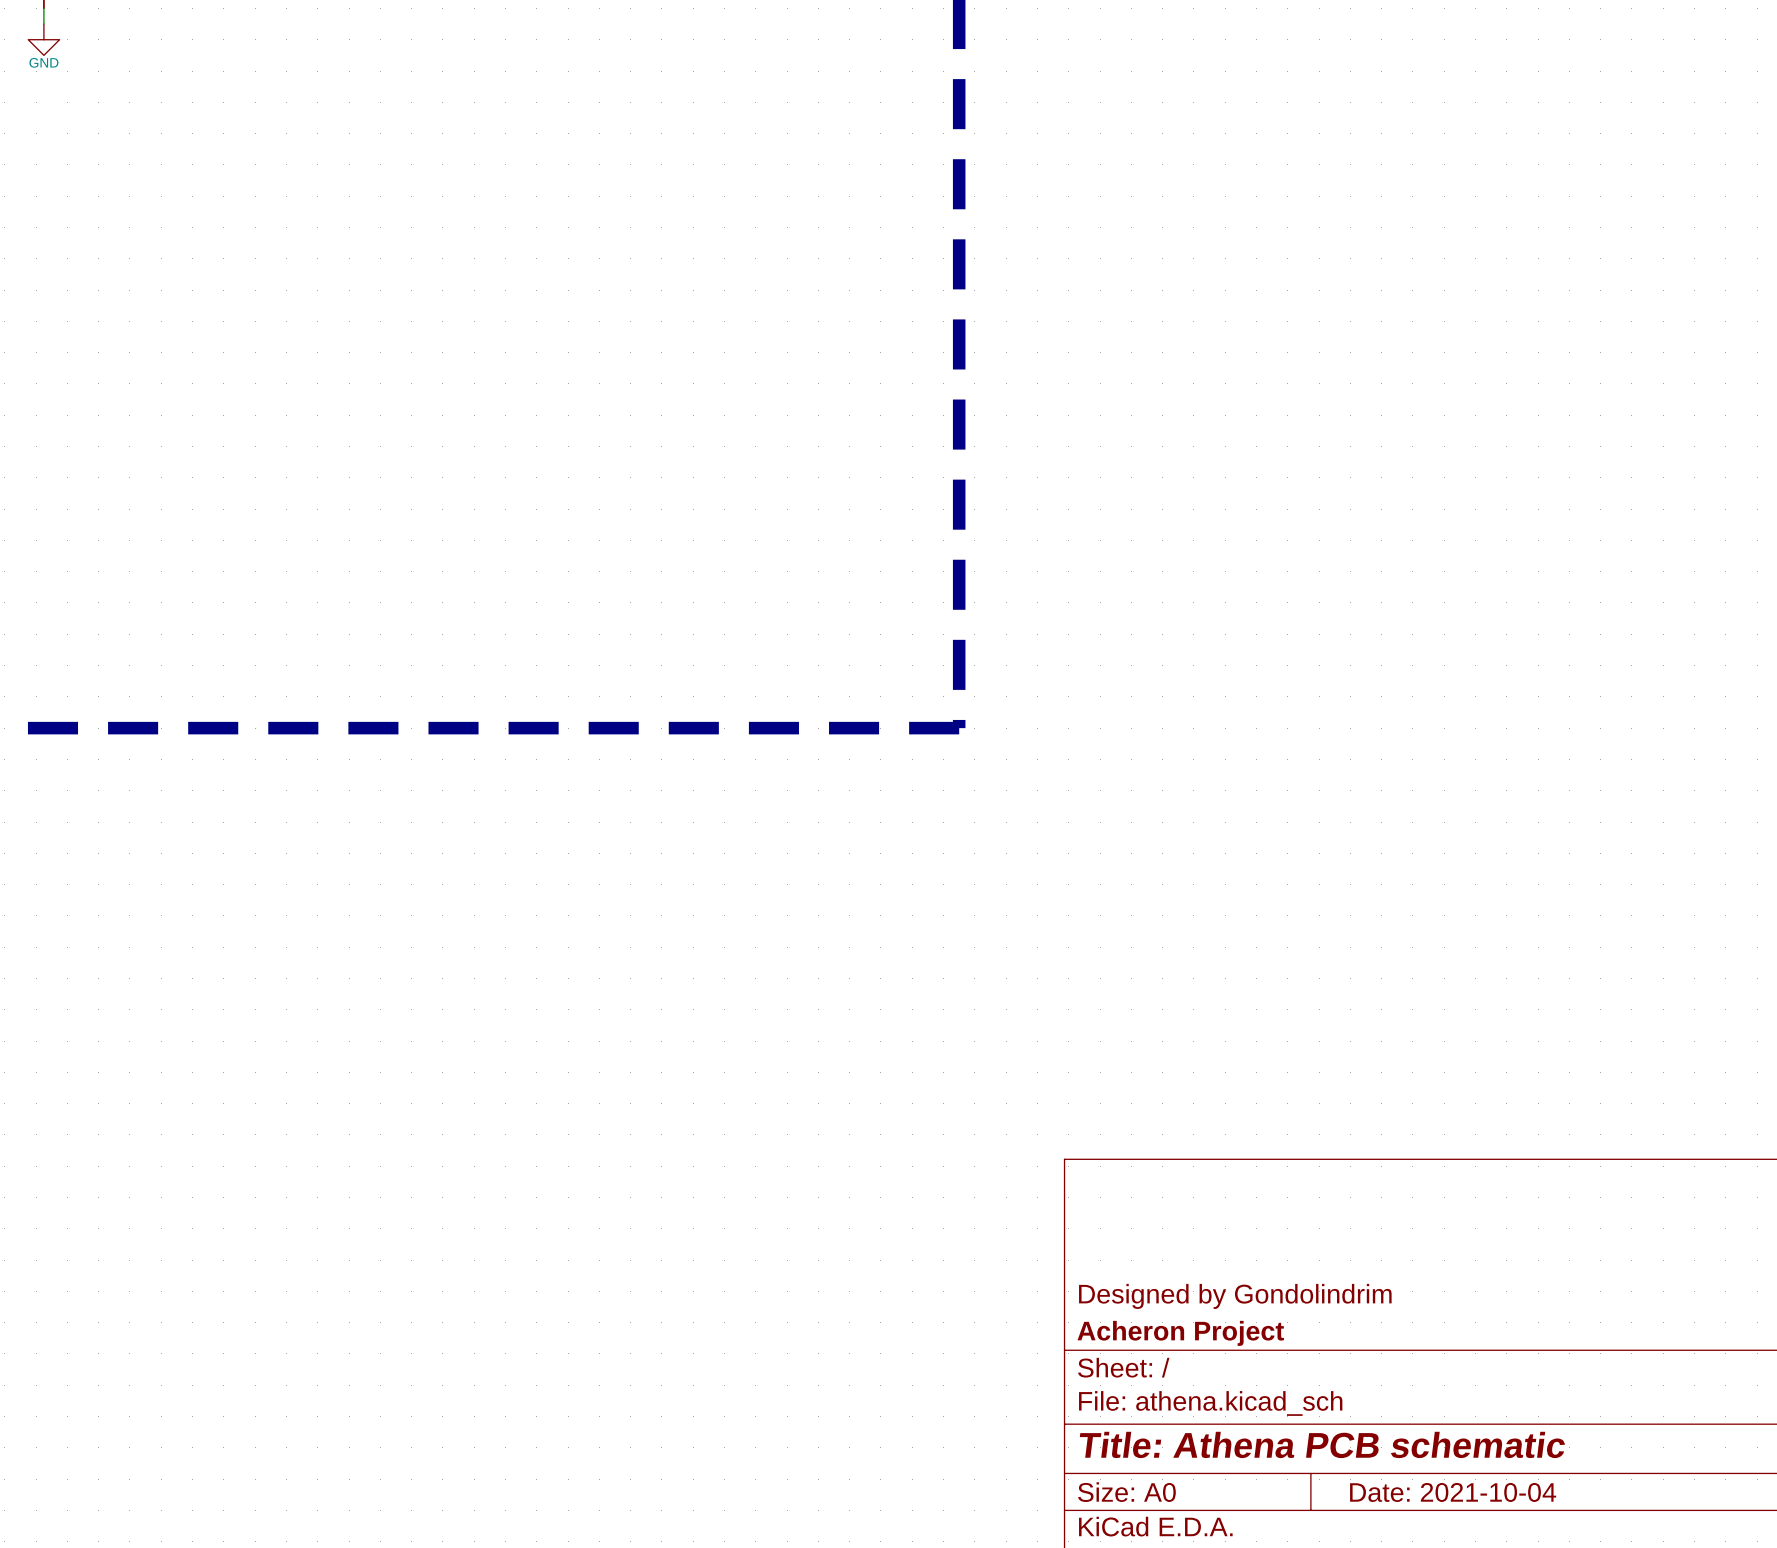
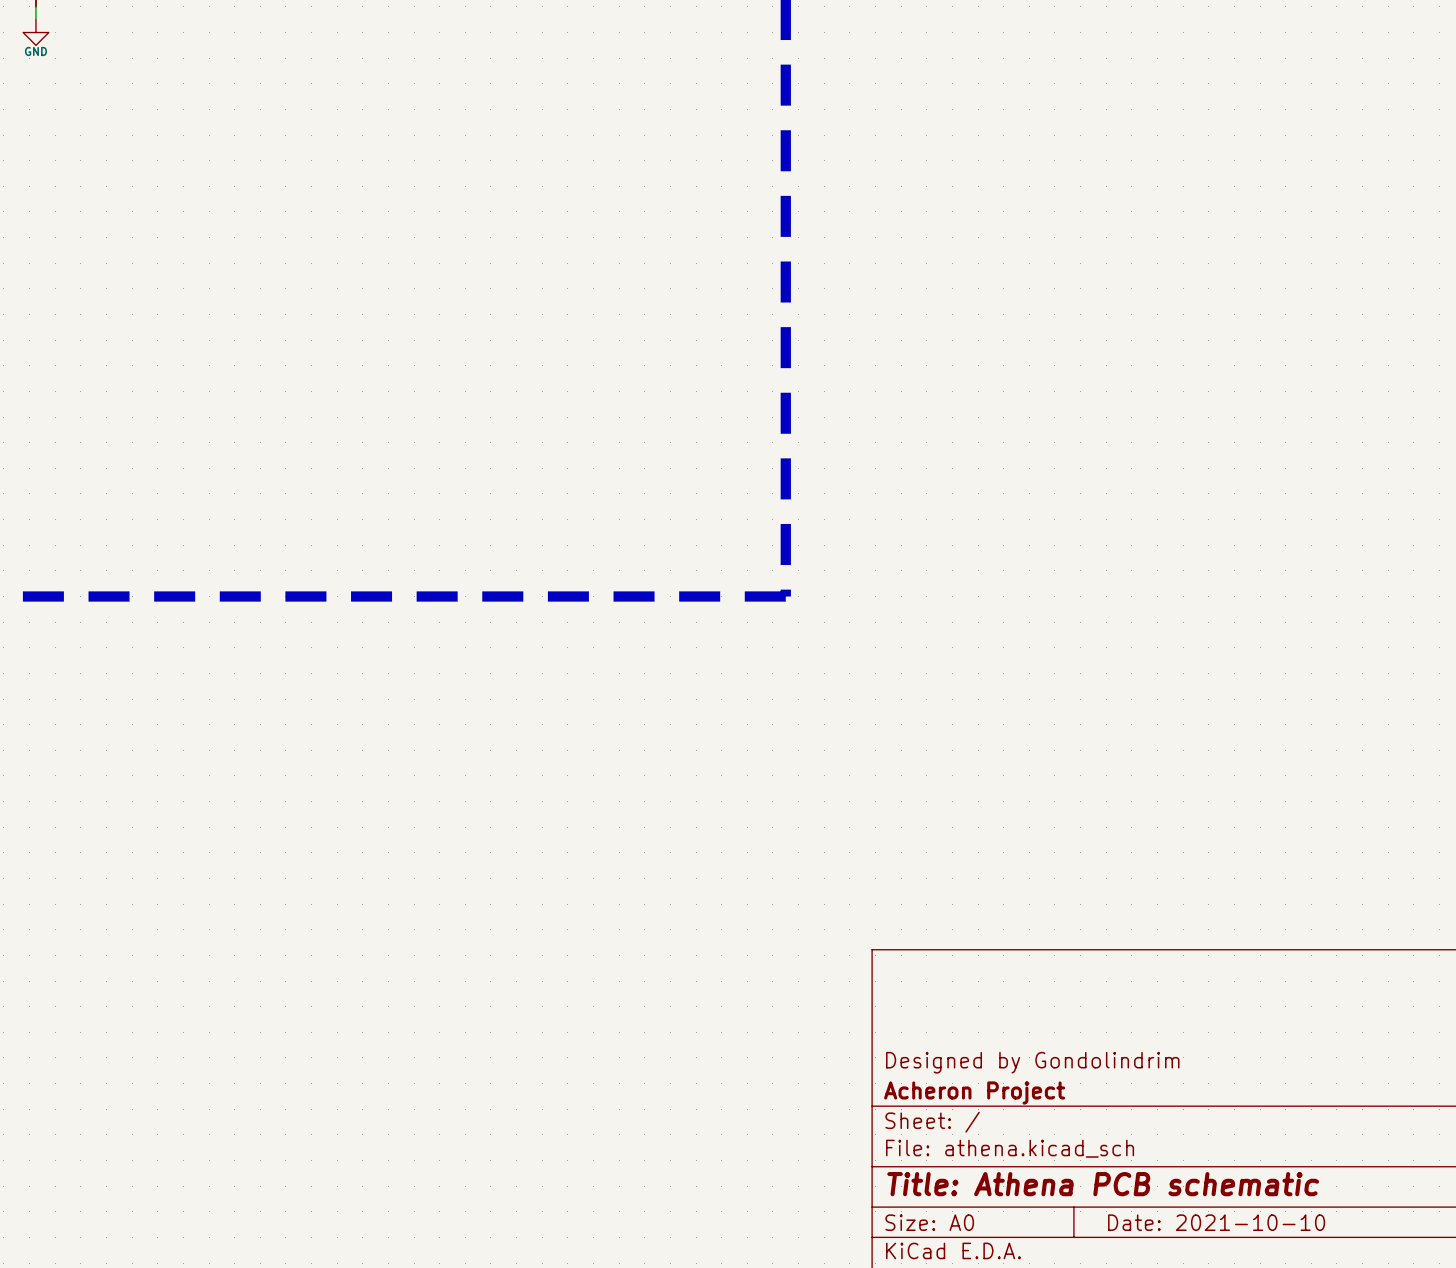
title block: Date: 2021-10-04 (1453, 1492) -> Date: 2021-10-10 (1216, 1222)

